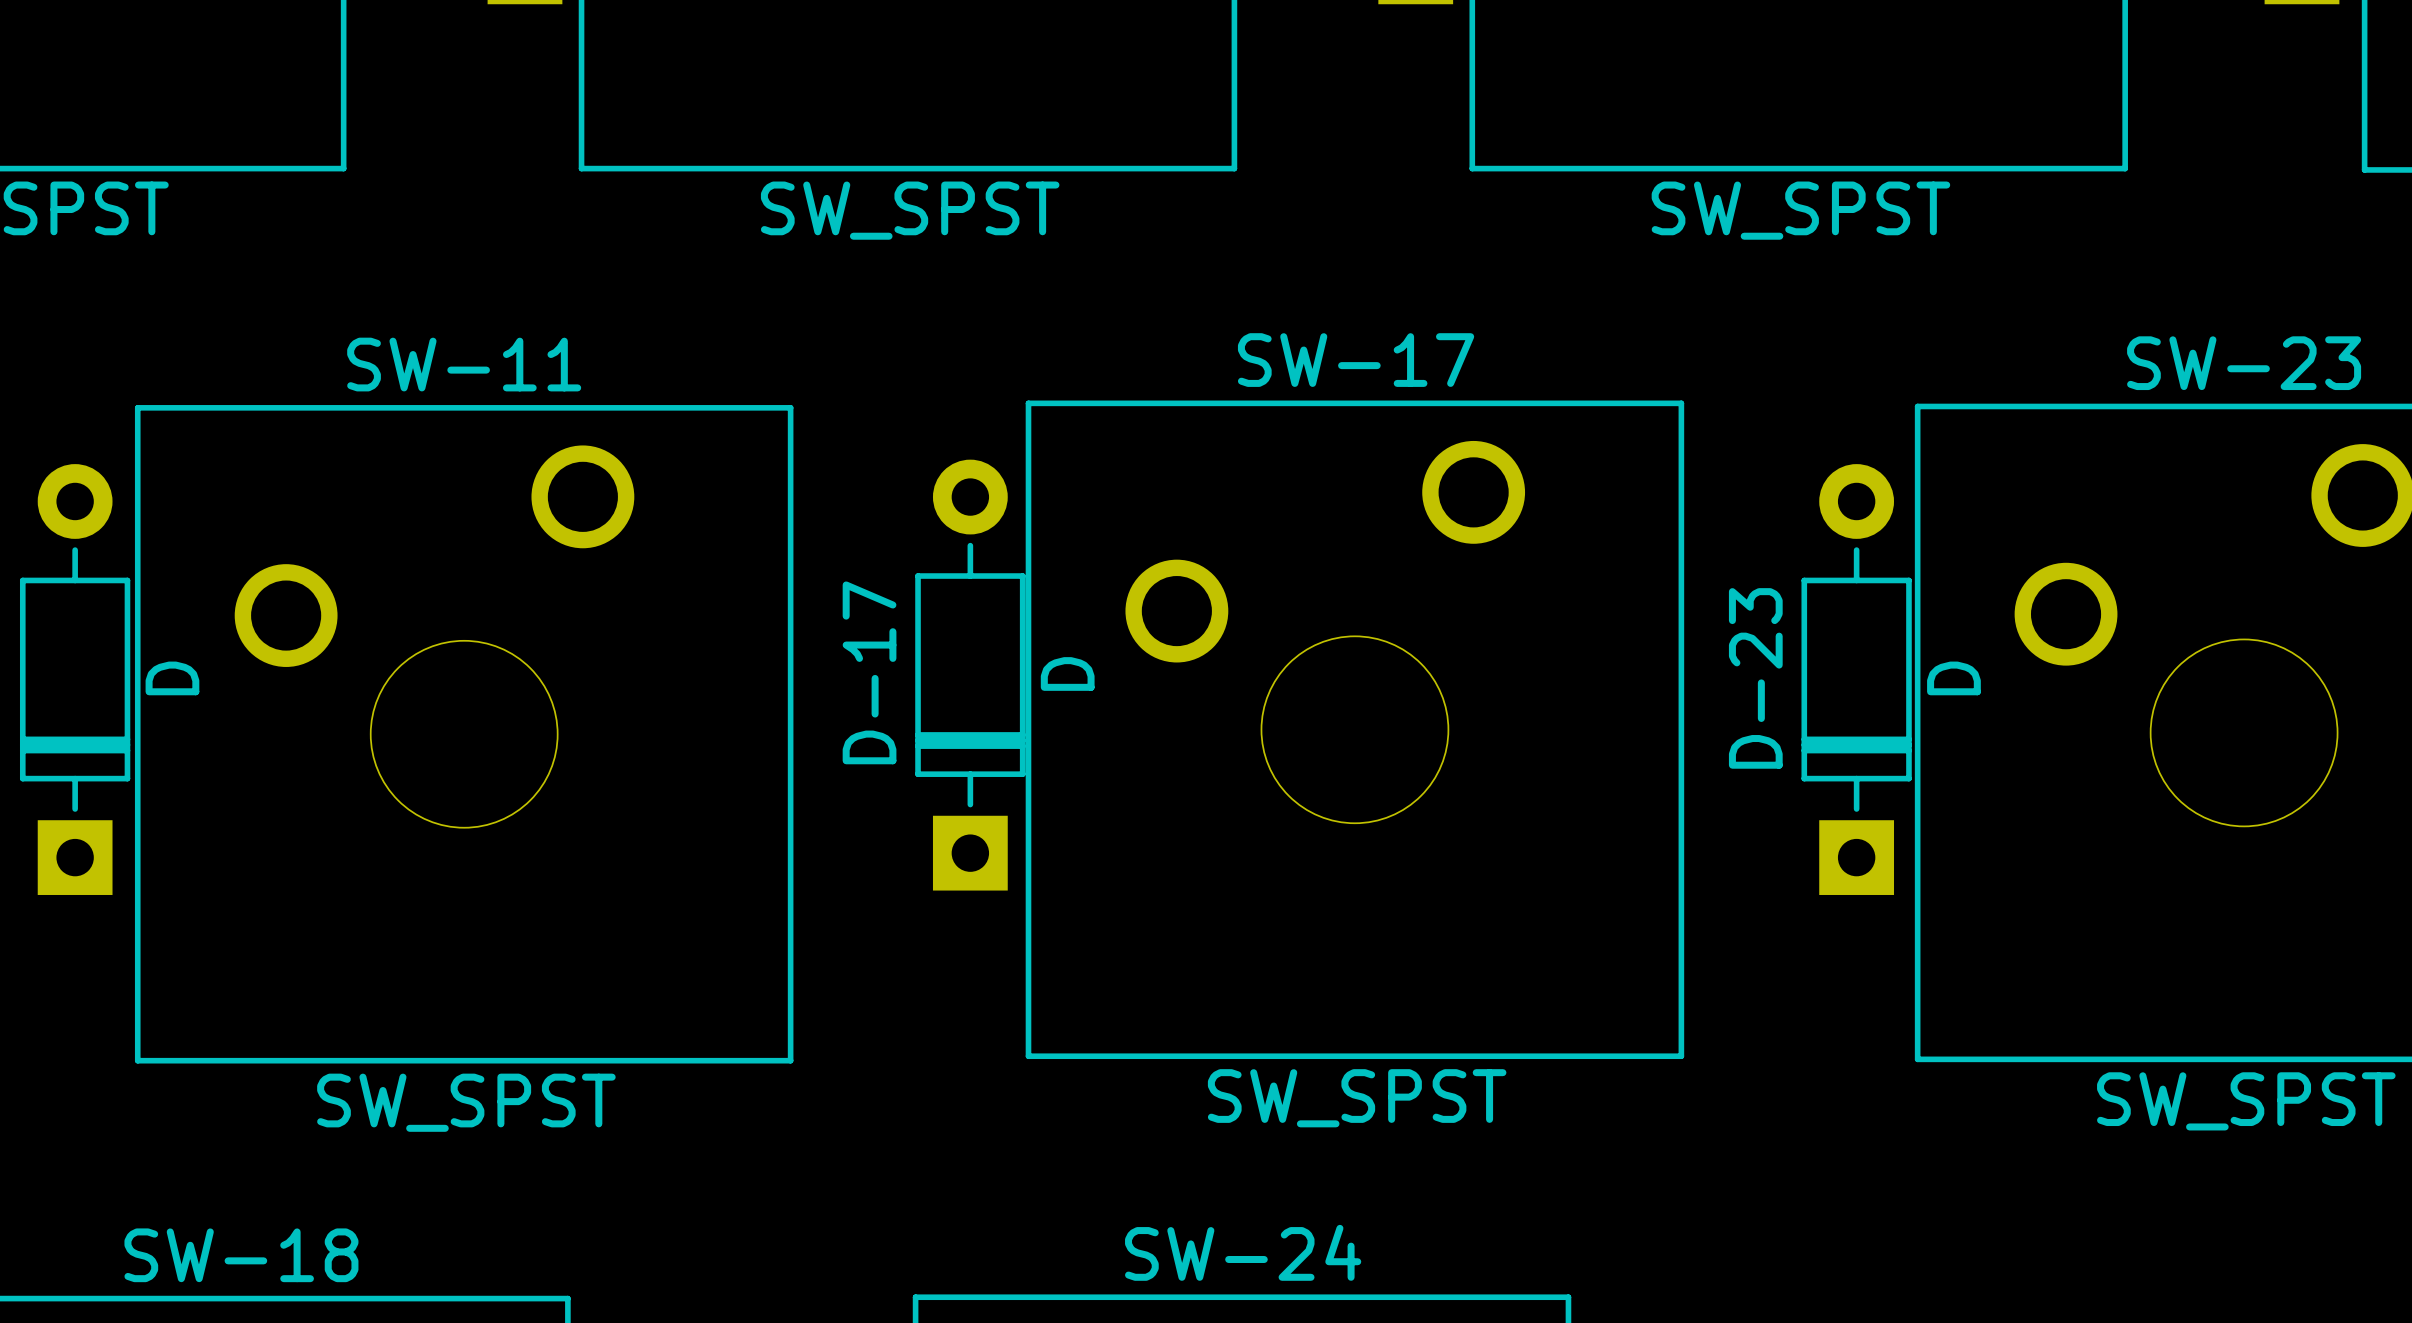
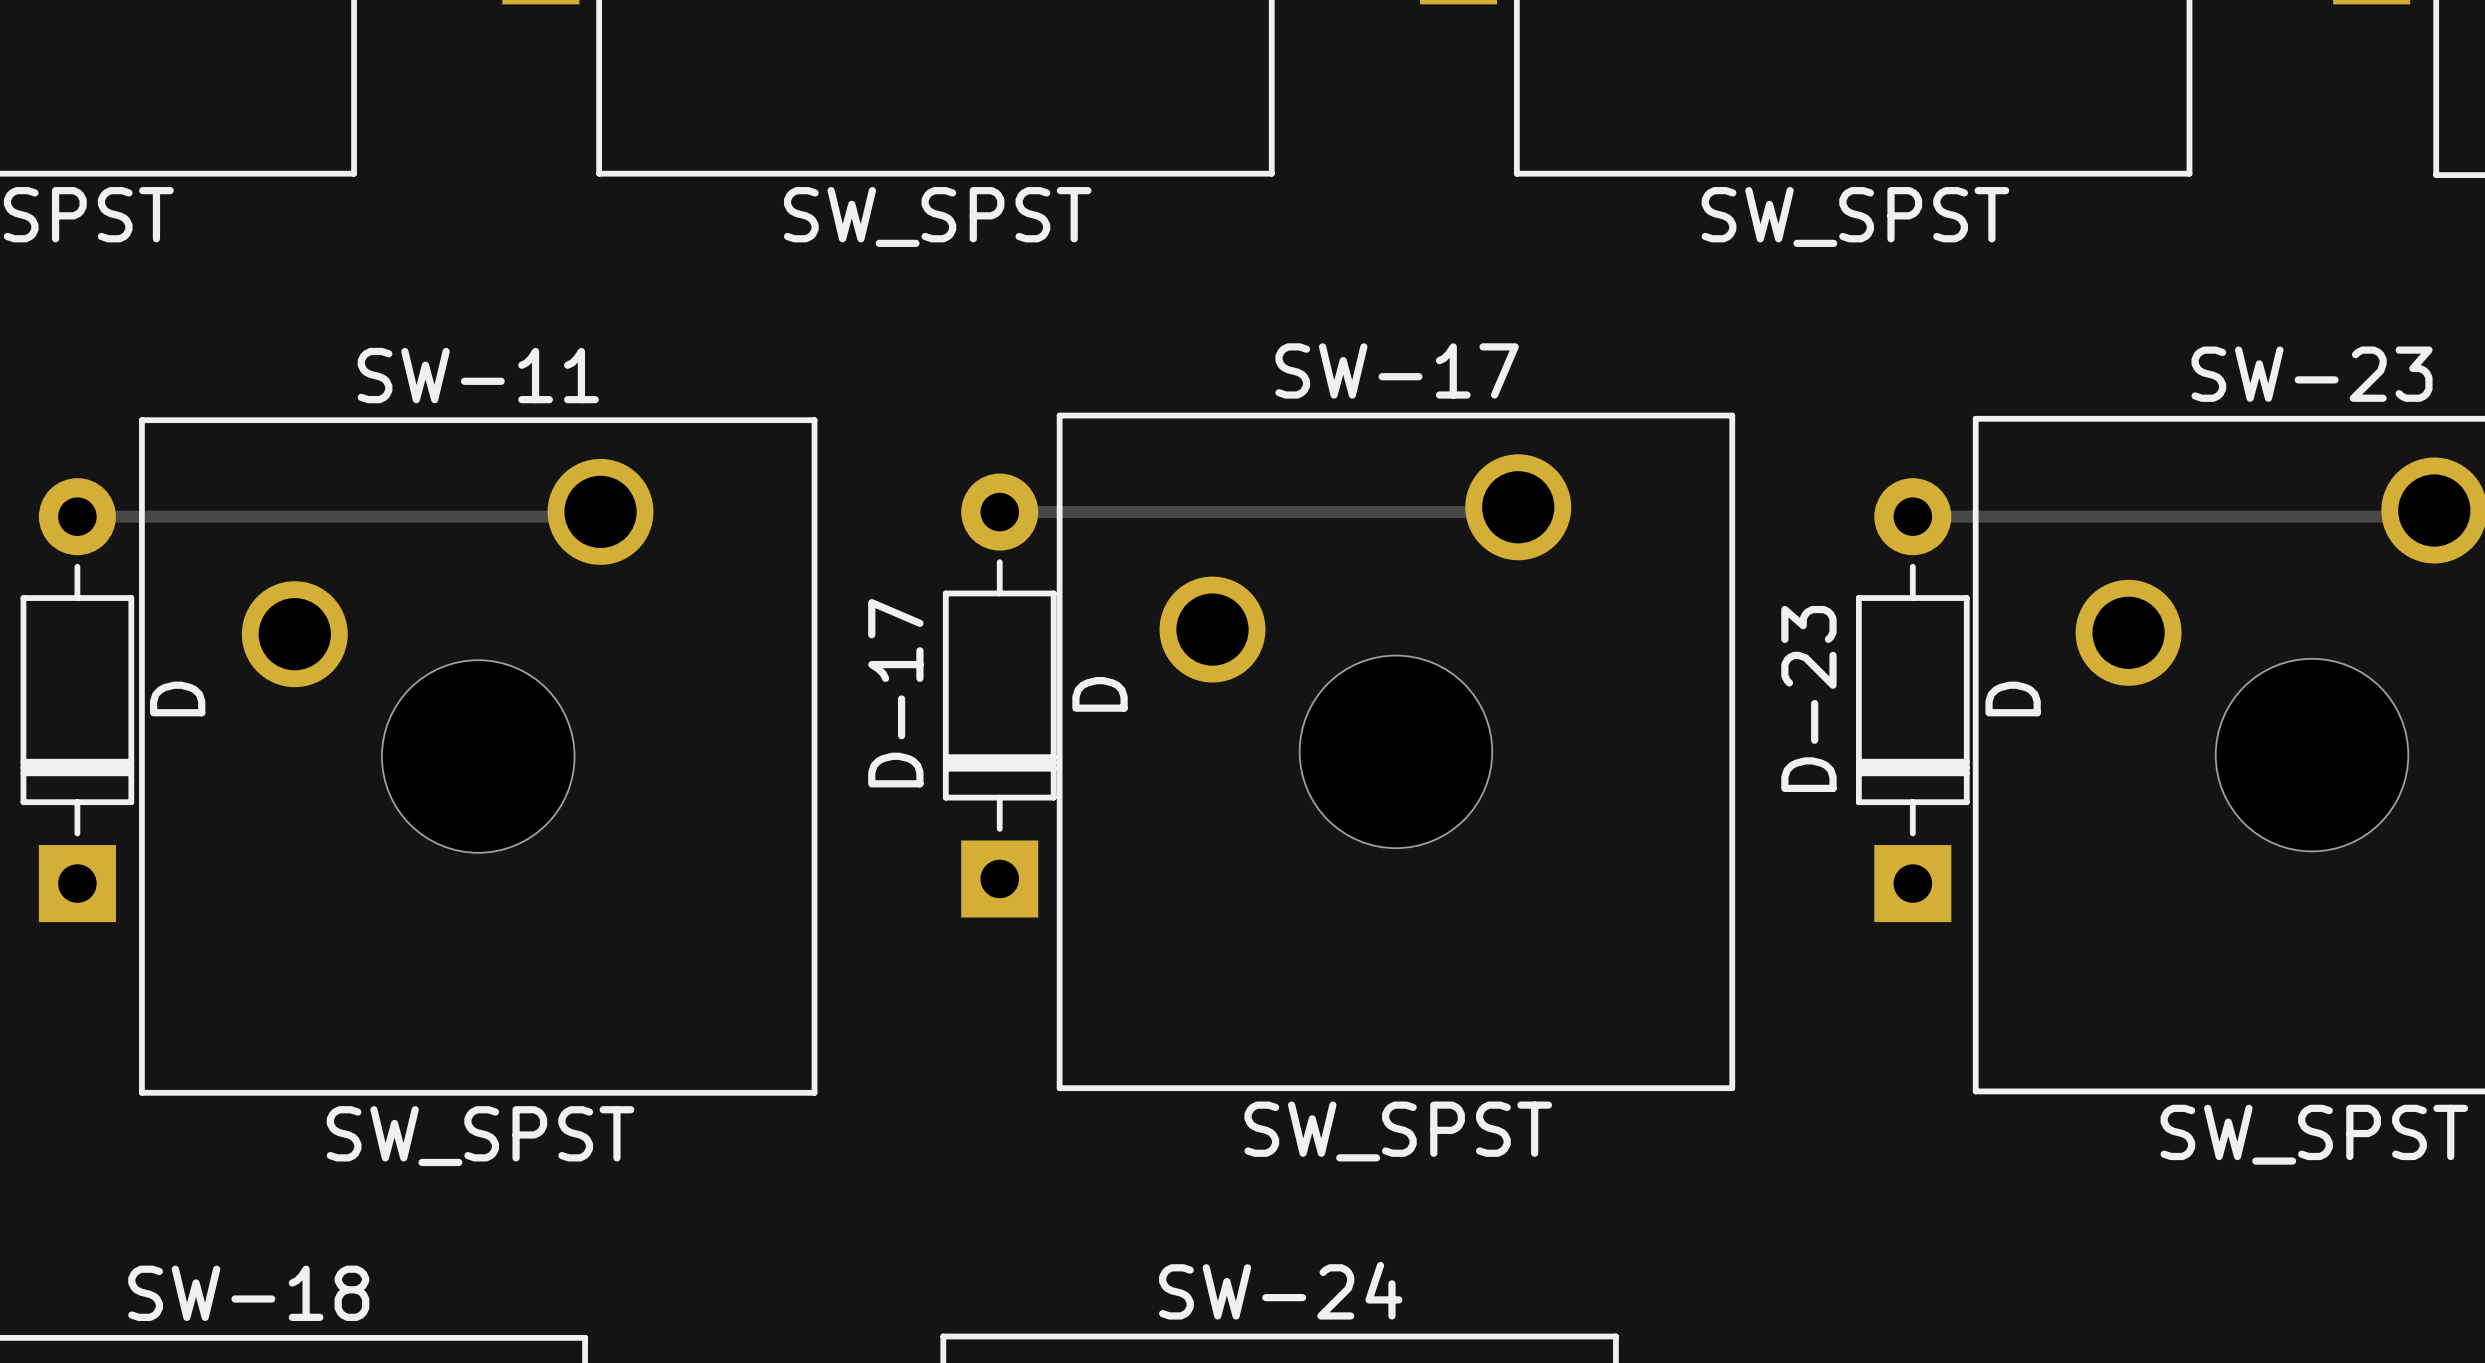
track: none -> (1518, 507) (1513, 512) (999, 512)
track: none -> (2434, 510) (2428, 516) (1912, 516)
track: none -> (600, 511) (595, 516) (77, 516)

